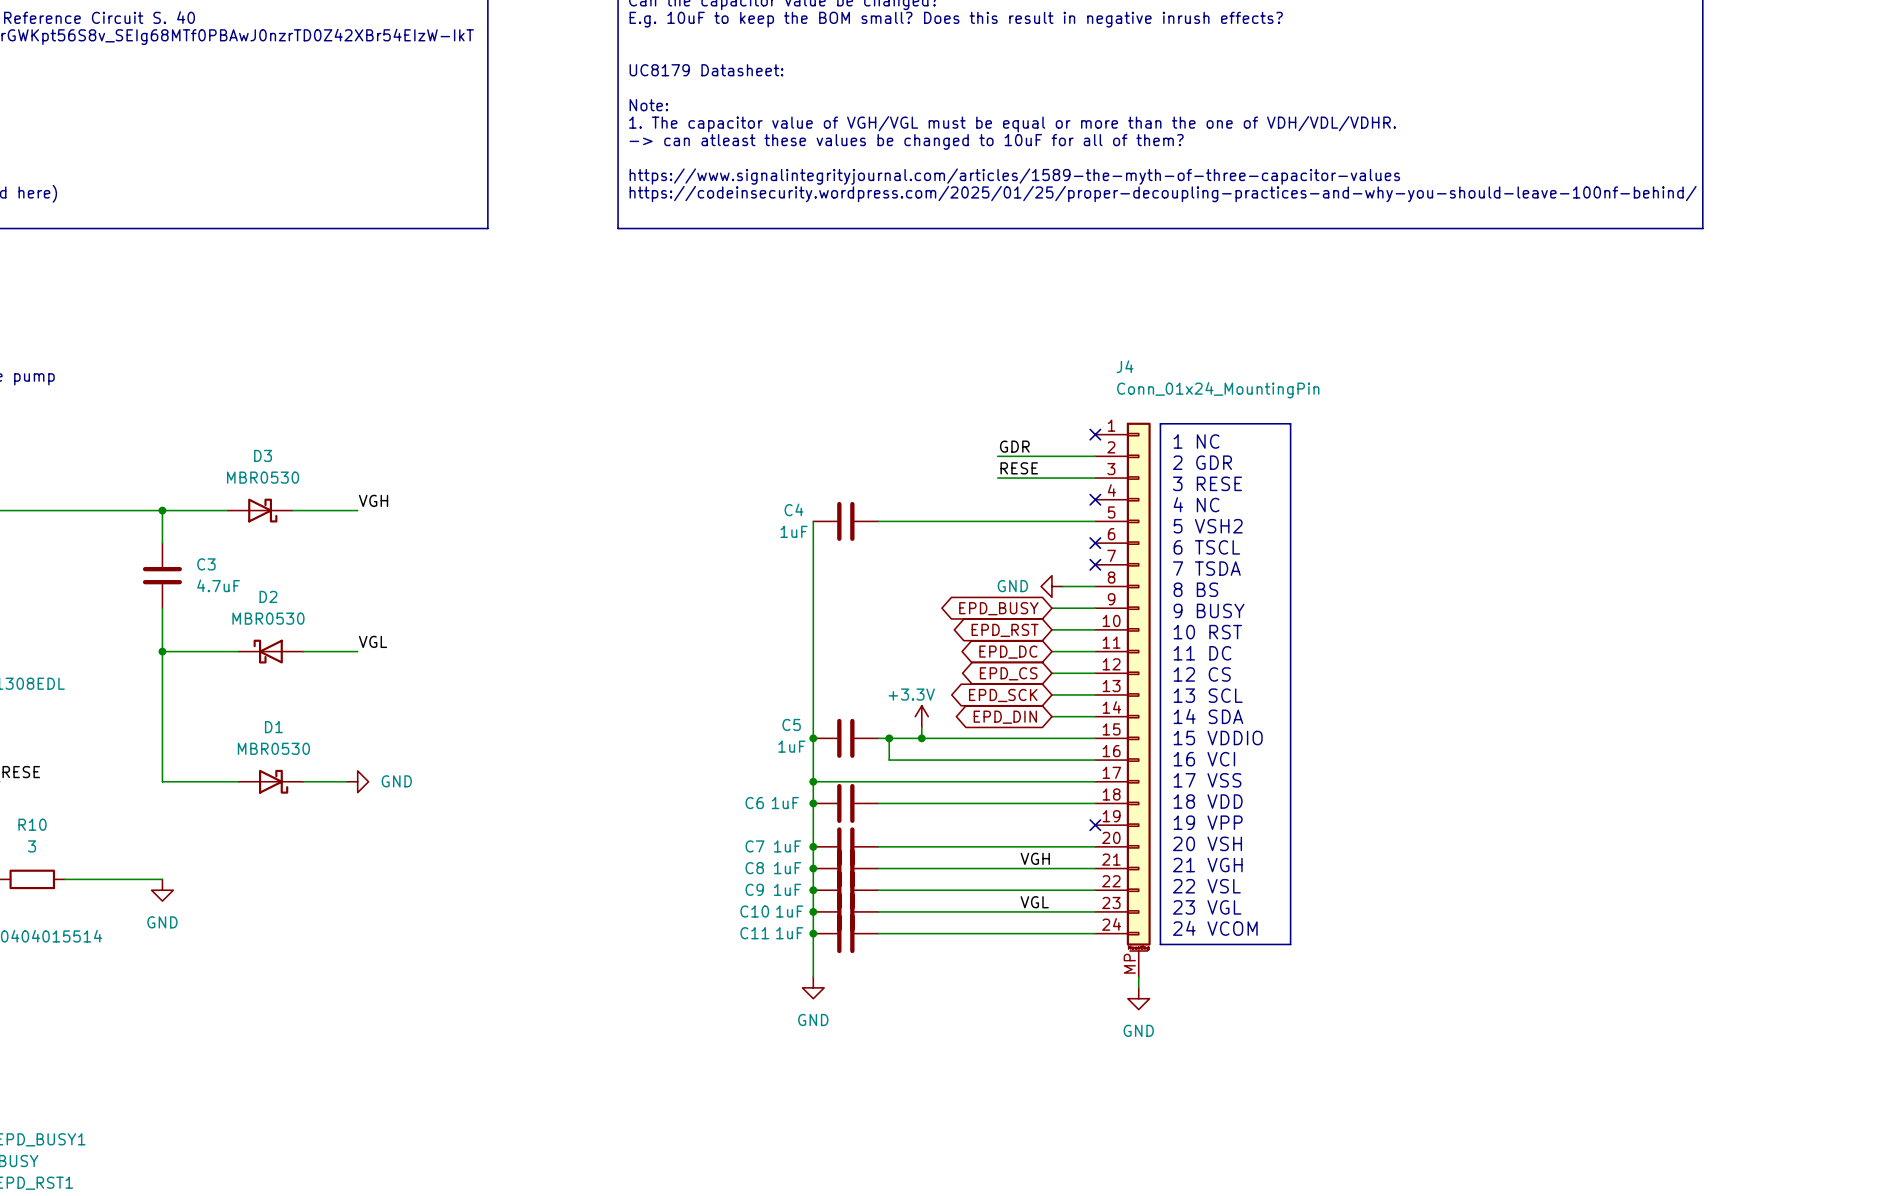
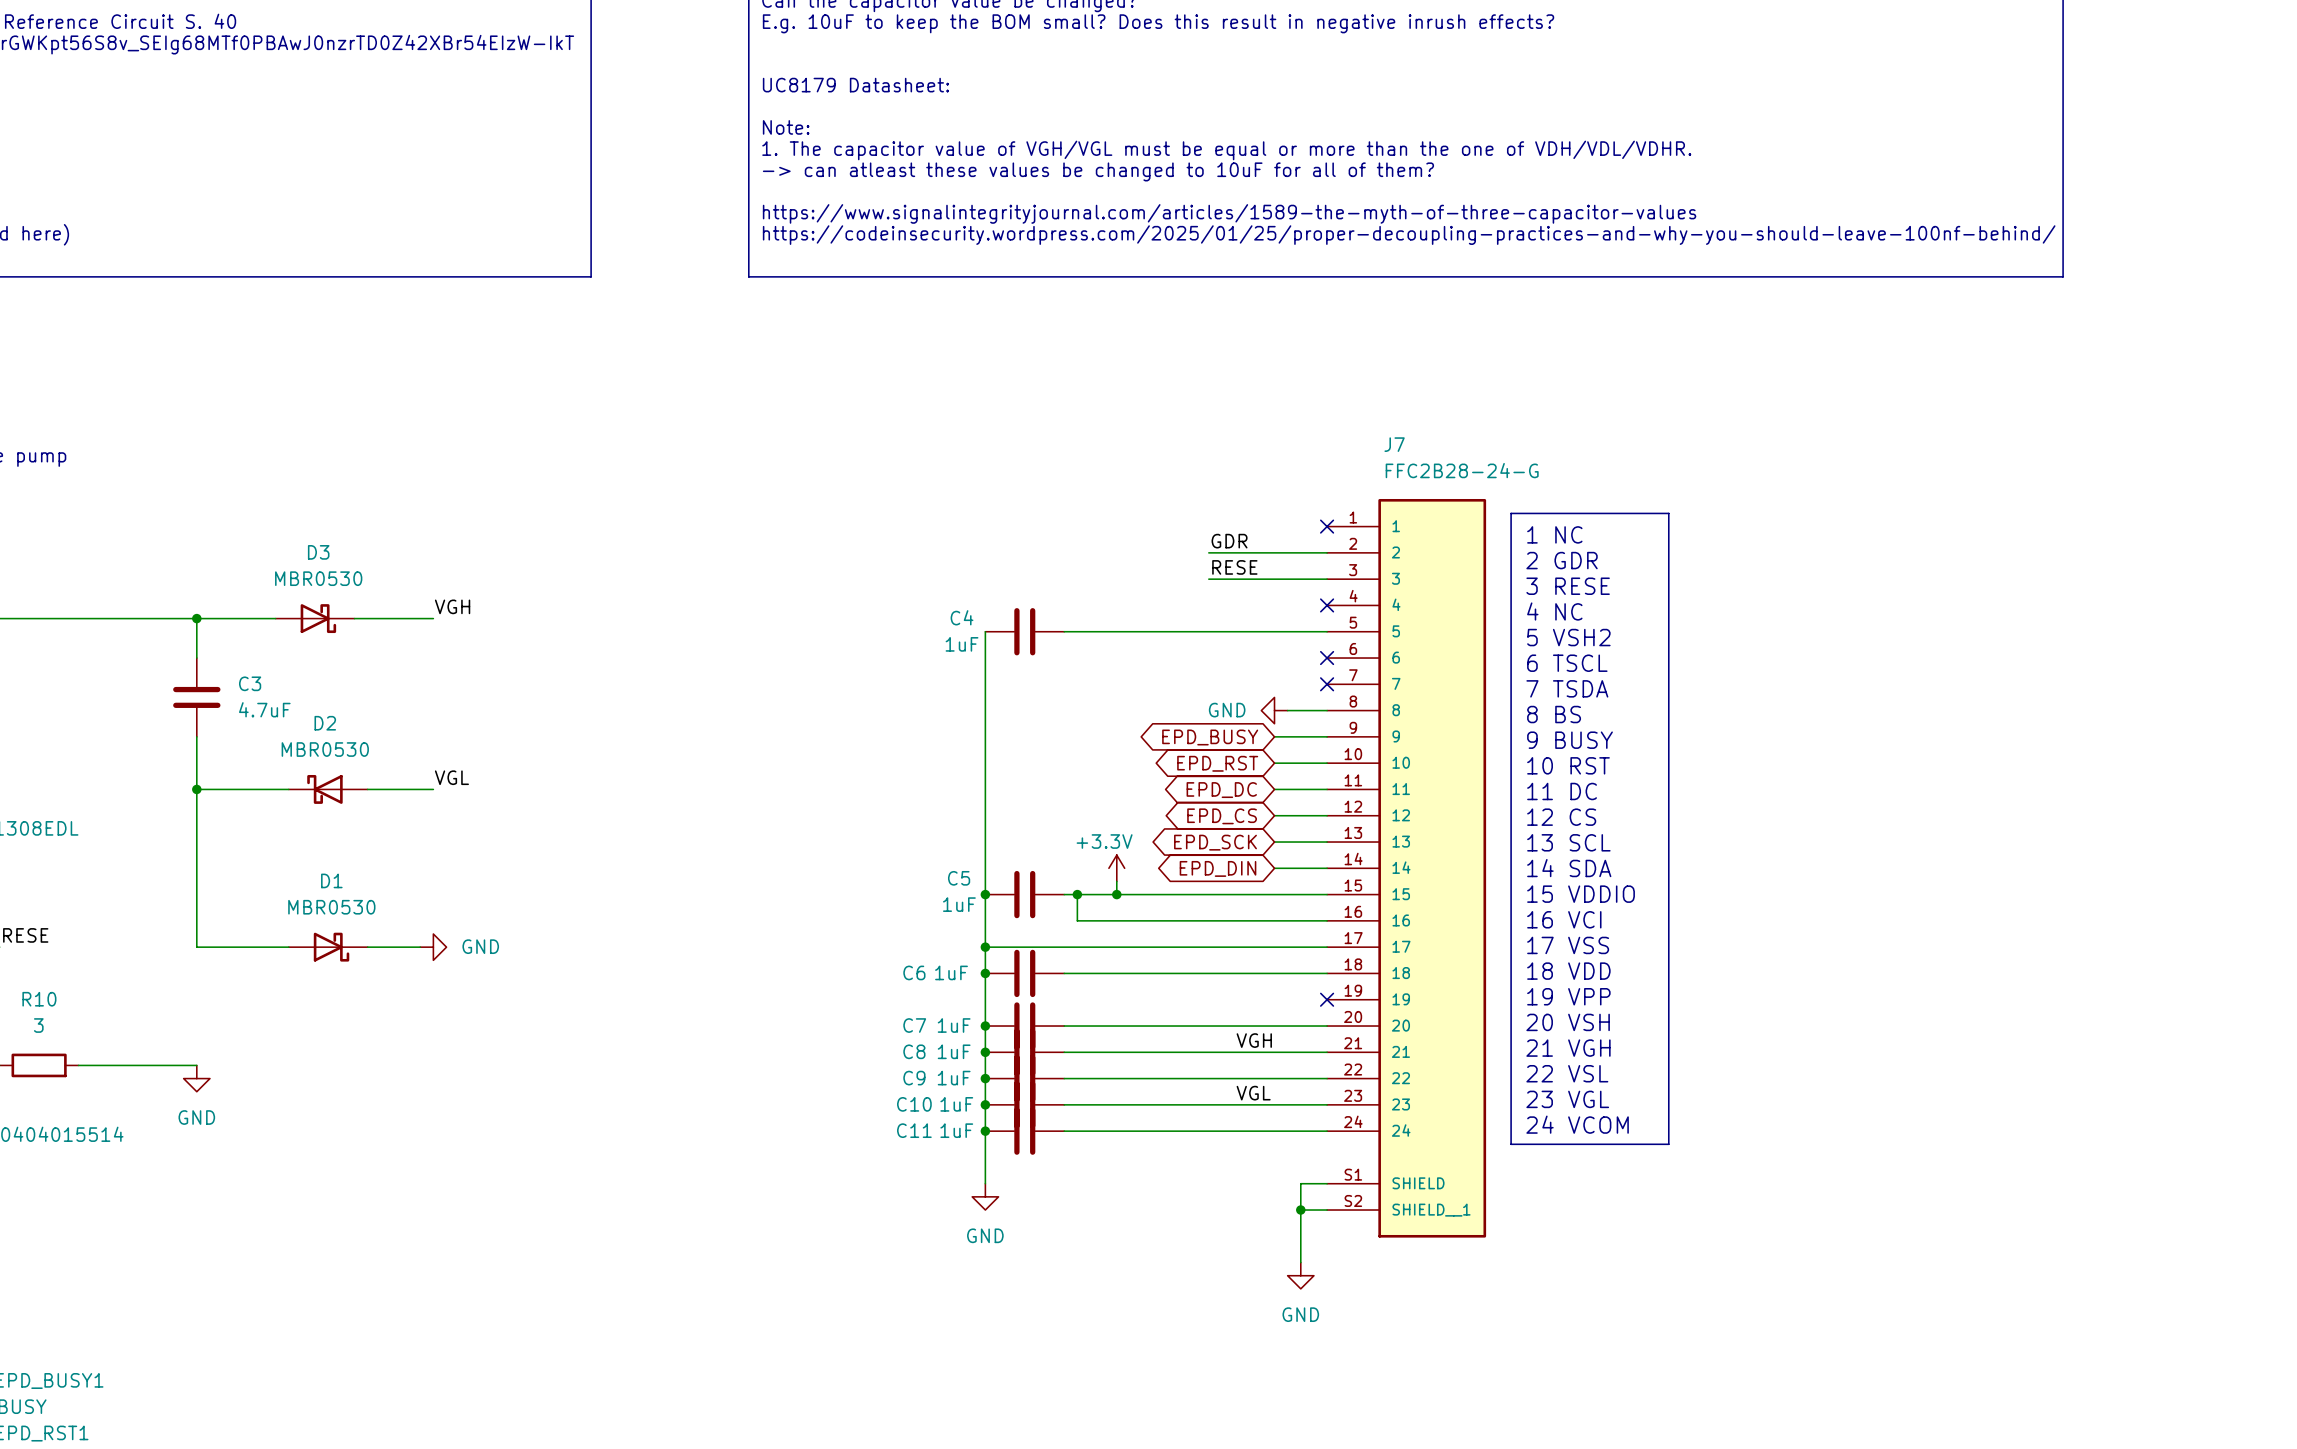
line: (1247, 423) (1160, 423) (1160, 944) (1247, 944) -> (1511, 513) (1511, 1144)
line: (1290, 423) (1290, 944) -> (1563, 513) (1668, 513) (1668, 1144) (1563, 1144)
text position: 1 NC (1196, 441) -> 1 NC (1554, 534)
text position: 2 GDR (1202, 462) -> 2 GDR (1562, 560)
text position: 3 RESE (1207, 483) -> 3 RESE (1568, 586)
text position: 4 NC (1196, 504) -> 4 NC (1554, 611)
text position: 5 VSH2 (1208, 526) -> 5 VSH2 (1568, 637)
text position: 6 TSCL (1206, 547) -> 6 TSCL (1567, 663)
text position: 7 TSDA (1206, 568) -> 7 TSDA (1567, 688)
text position: 8 BS (1195, 589) -> 8 BS (1554, 714)
text position: 9 BUSY (1209, 610) -> 9 BUSY (1570, 740)
text position: 10 RST (1207, 632) -> 10 RST (1568, 765)
text position: 11 DC (1202, 653) -> 11 DC (1562, 791)
text position: 12 CS (1202, 674) -> 12 CS (1561, 817)
text position: 13 SCL (1208, 695) -> 13 SCL (1568, 842)
J4: Conn_01x24_MountingPin (1123, 699) -> none
J7: none -> FFC2B28-24-G (1406, 868)
text position: 14 SDA (1208, 716) -> 14 SDA (1569, 868)
text position: 15 VDDIO (1218, 737) -> 15 VDDIO (1581, 894)
text position: 16 VCI (1204, 759) -> 16 VCI (1564, 919)
text position: 17 VSS (1207, 780) -> 17 VSS (1568, 945)
text position: 18 VDD (1208, 801) -> 18 VDD (1568, 971)
text position: 19 VPP (1208, 822) -> 19 VPP (1568, 996)
text position: 20 VSH (1207, 843) -> 20 VSH (1568, 1022)
text position: 21 VGH (1207, 865) -> 21 VGH (1568, 1048)
text position: 22 VSL (1206, 886) -> 22 VSL (1567, 1073)
text position: 23 VGL (1207, 907) -> 23 VGL (1567, 1099)
text position: 24 VCOM (1215, 928) -> 24 VCOM (1577, 1124)
wire: none -> (1327, 1183) (1300, 1183) (1300, 1262)
wire: none -> (1300, 1210) (1327, 1210)
junction: none -> (1300, 1210)
power symbol position: GND (1138, 998) -> GND (1300, 1275)

